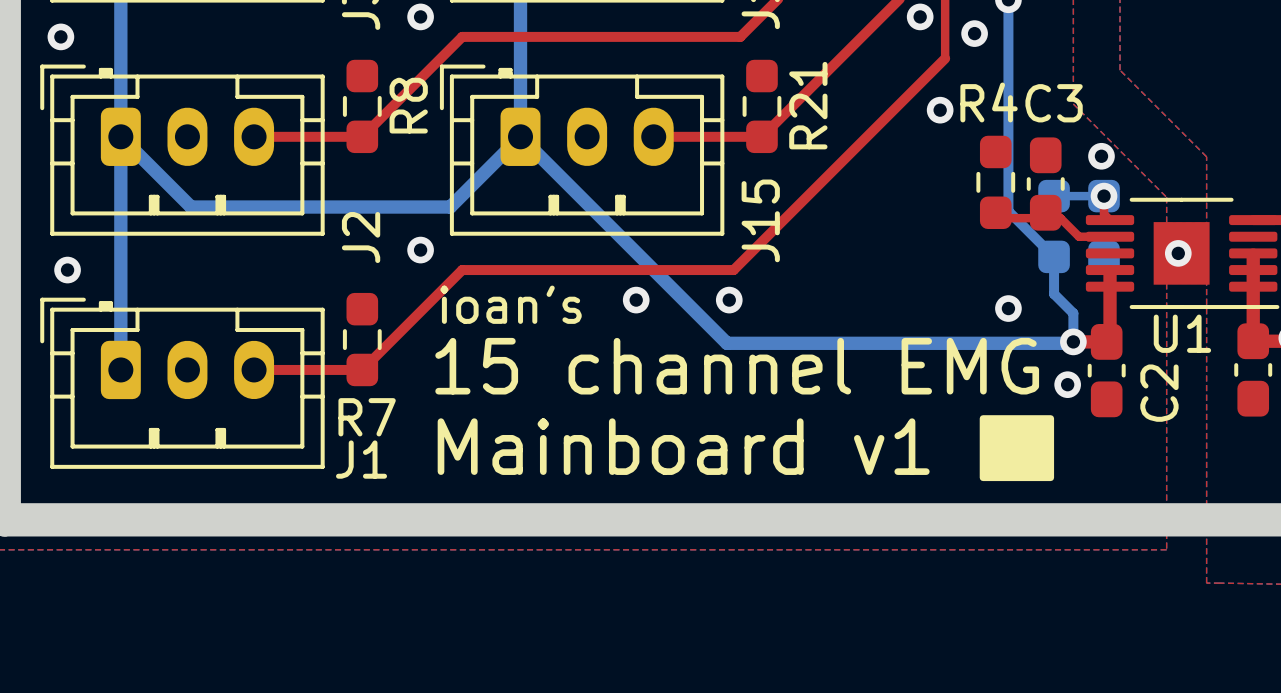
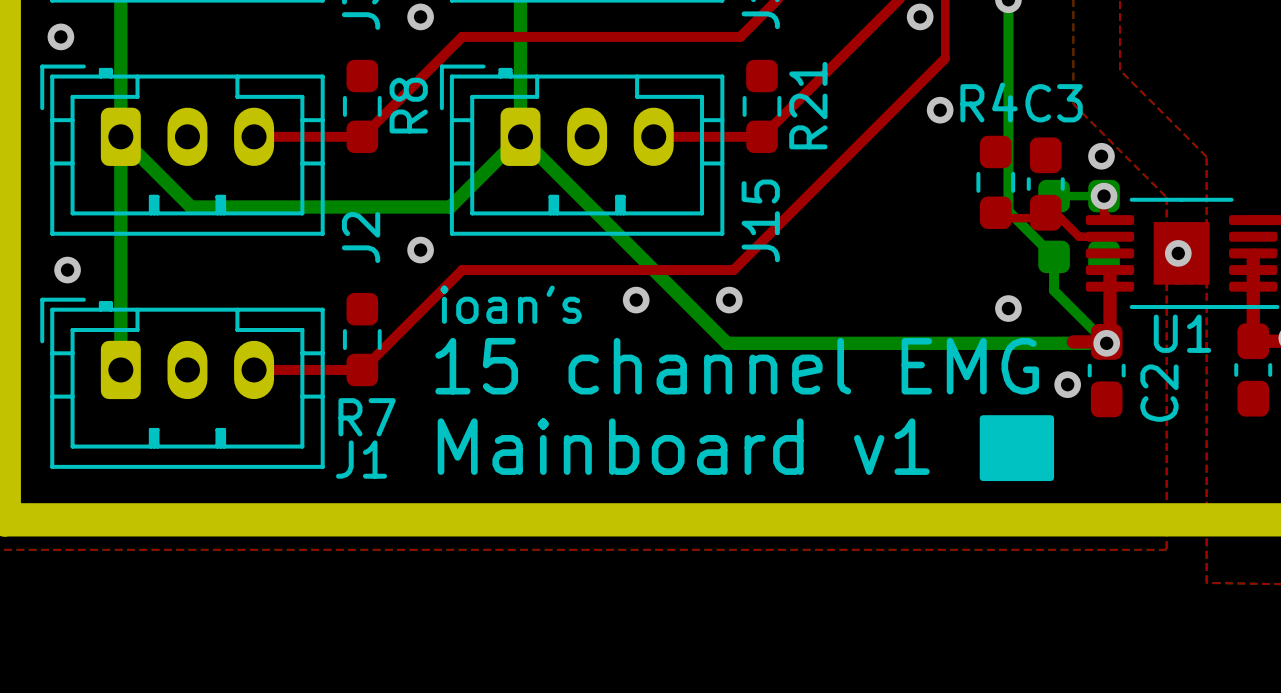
via: (974, 33) -> none
bottom track: (1054, 290) (1054, 294) (1073, 313) (1071, 343) -> (1054, 290) (1106, 343) (1071, 343)
via position: (1073, 341) -> (1106, 343)

